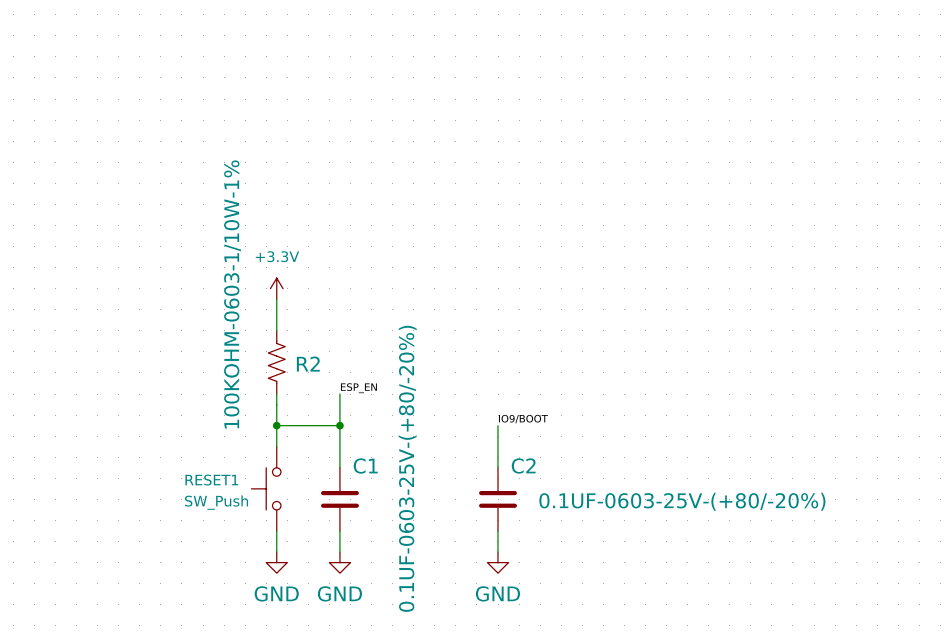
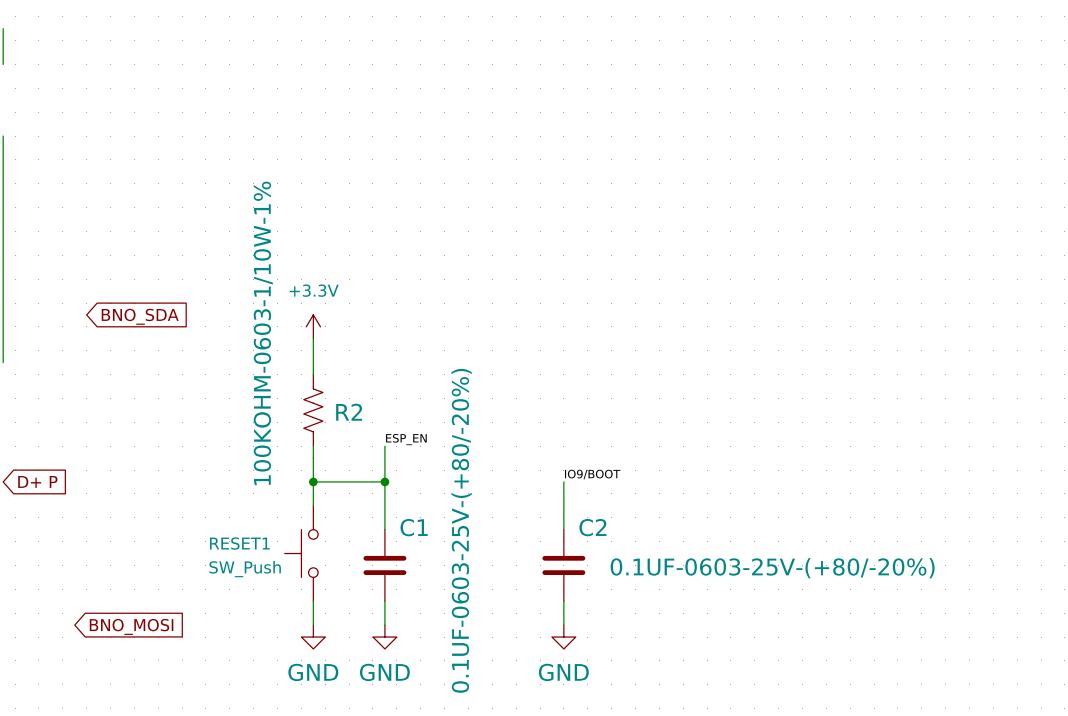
wire: none -> (3, 28) (3, 64)
wire: none -> (3, 136) (3, 362)
global label: none -> BNO_SDA (140, 316)
global label: none -> D+ P (37, 481)
global label: none -> BNO_MOSI (131, 626)

